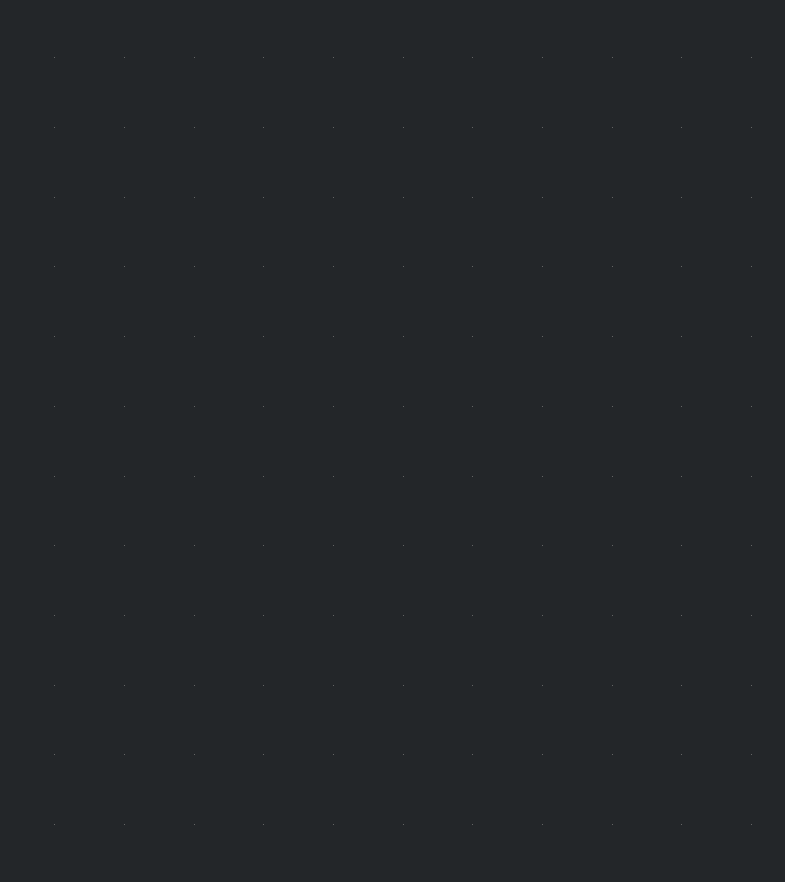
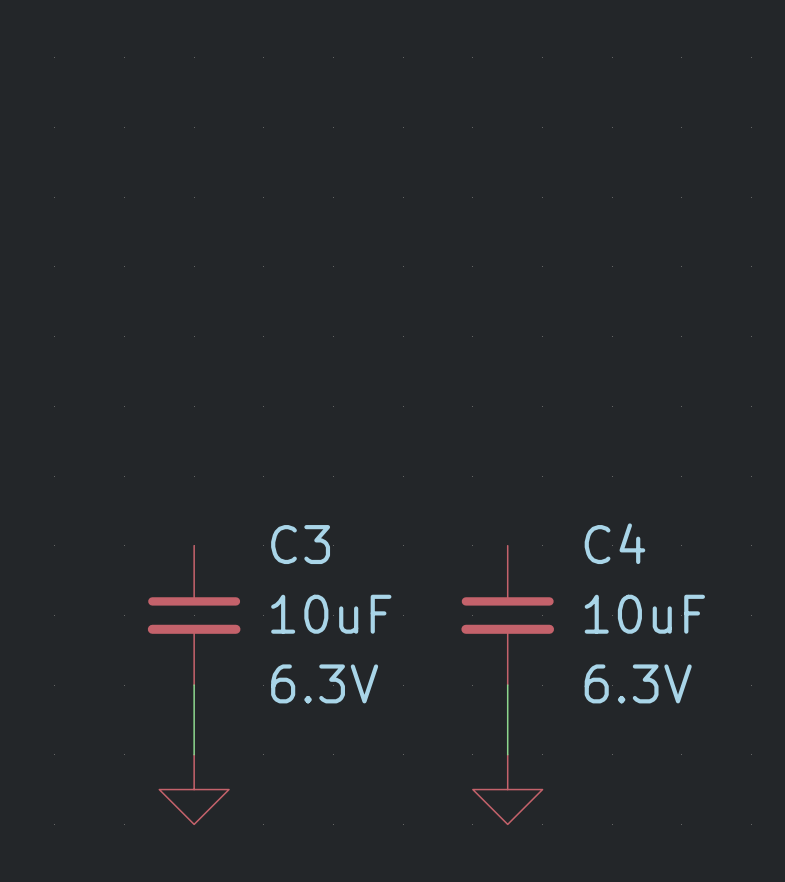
C3: none -> 10uF (194, 615)
C4: none -> 10uF (507, 615)
wire: none -> (194, 685) (194, 754)
wire: none -> (507, 685) (507, 754)
power symbol: none -> (194, 789)
power symbol: none -> (507, 789)

